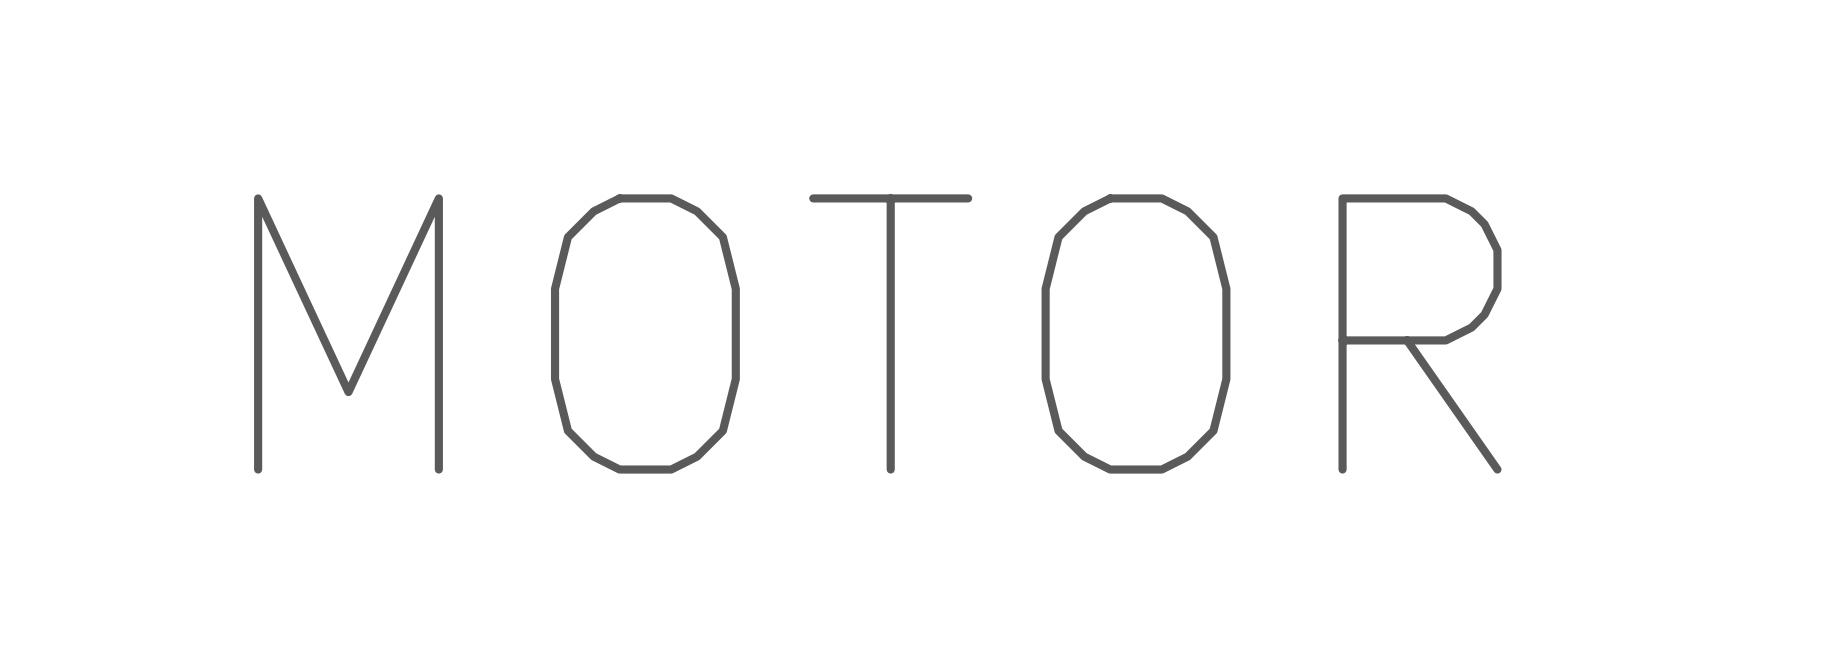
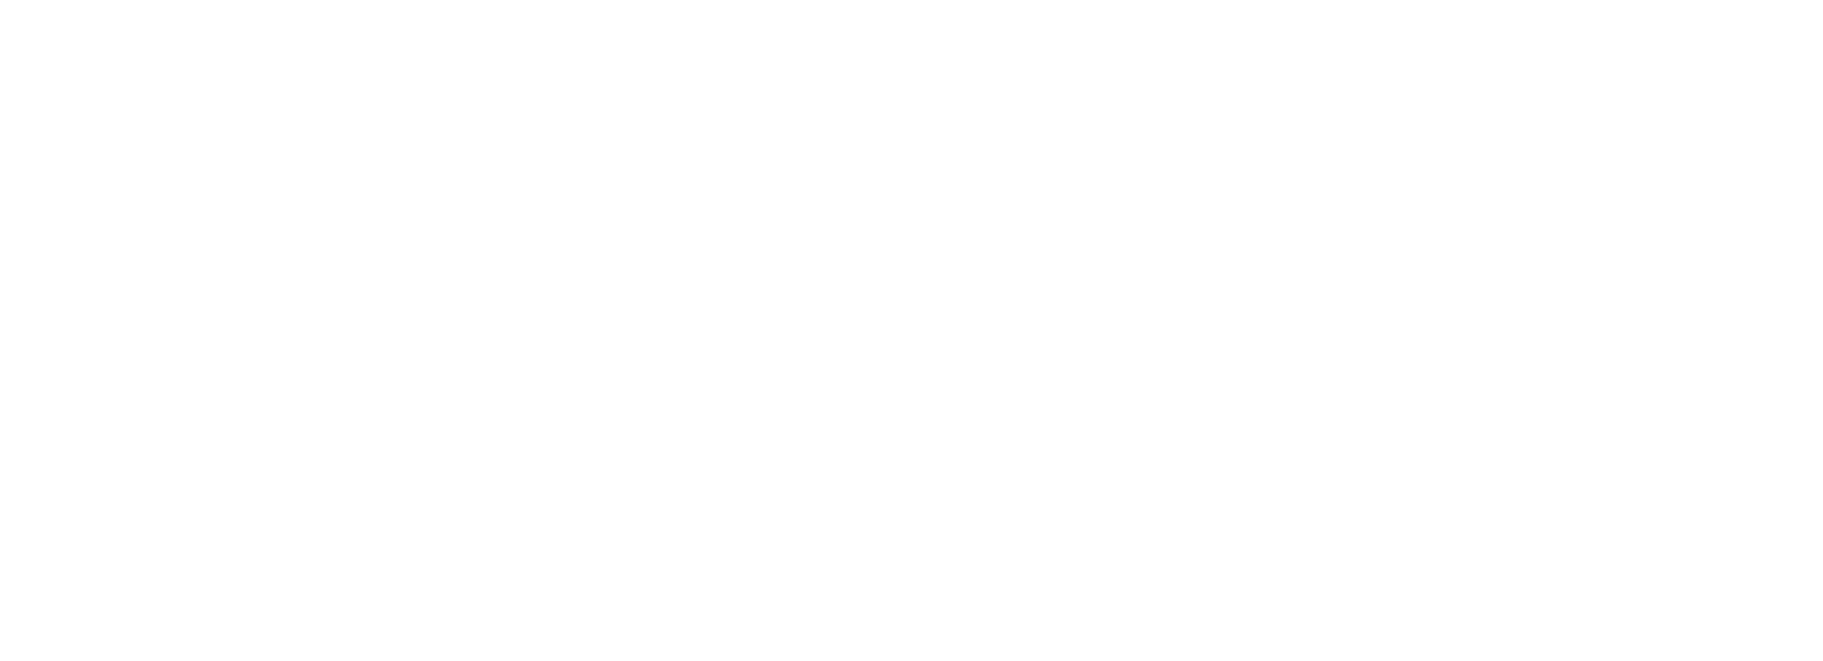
text: MOTOR (877, 333) -> none

